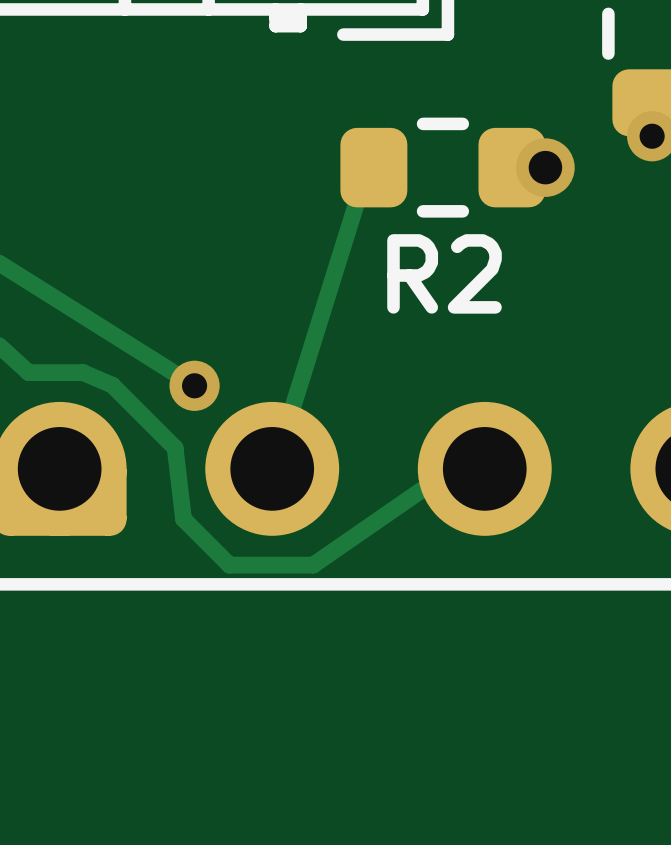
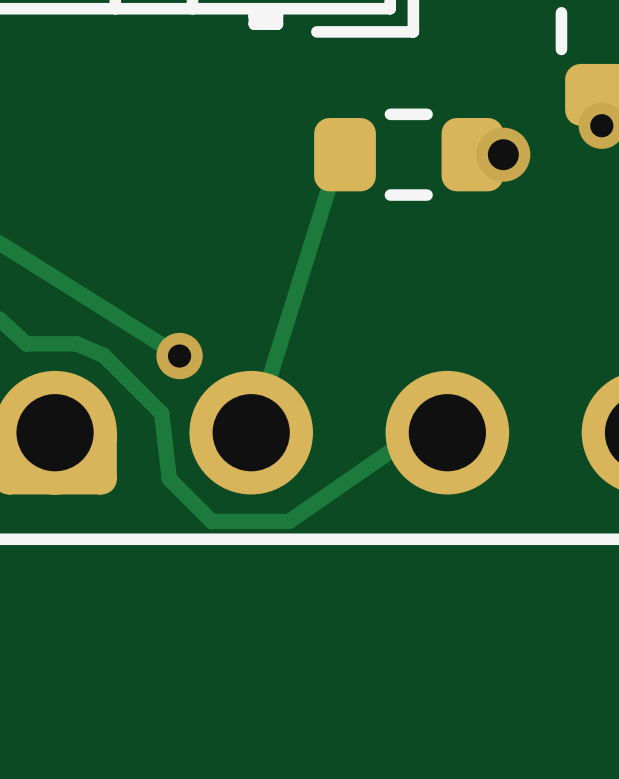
R2 name: R2 (444, 273) -> none

